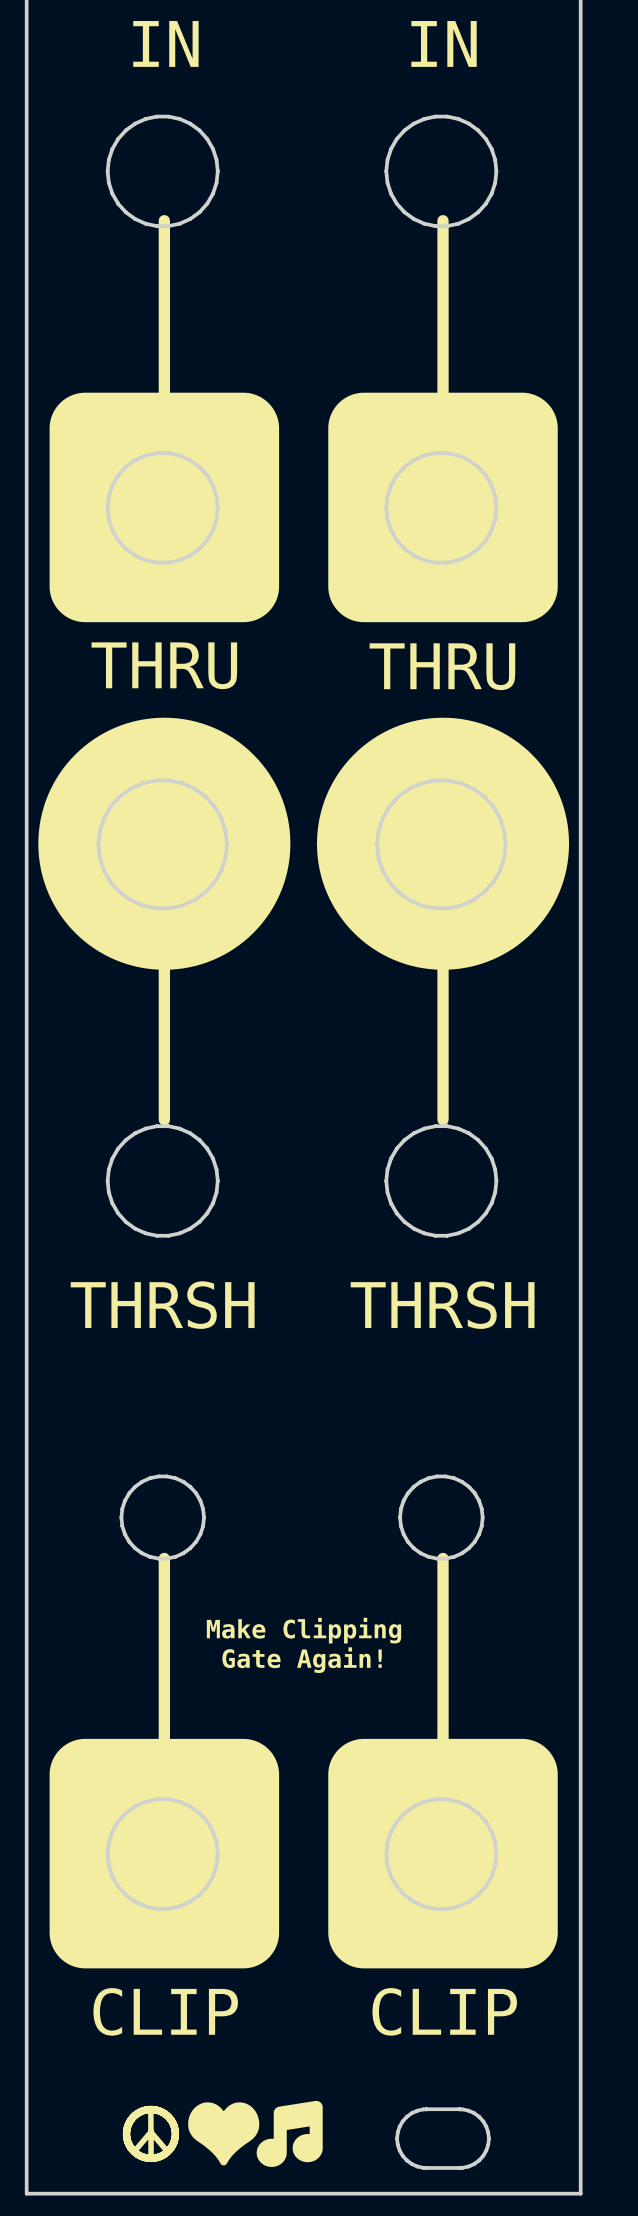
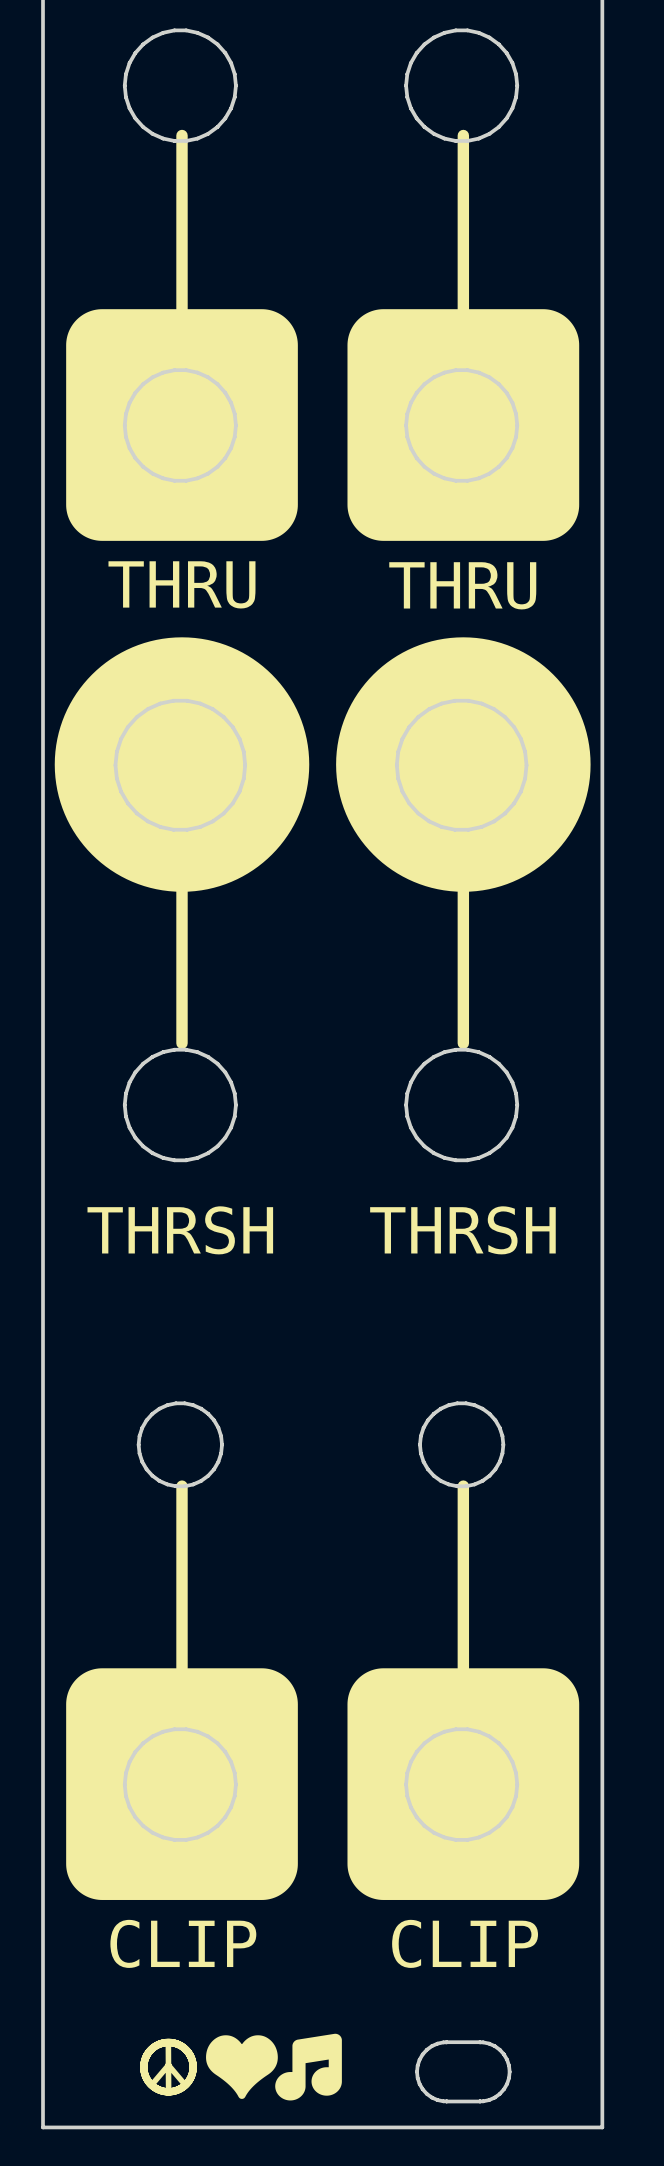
text: Make Clipping (304, 1630) -> none
text: Gate Again! (302, 1660) -> none

